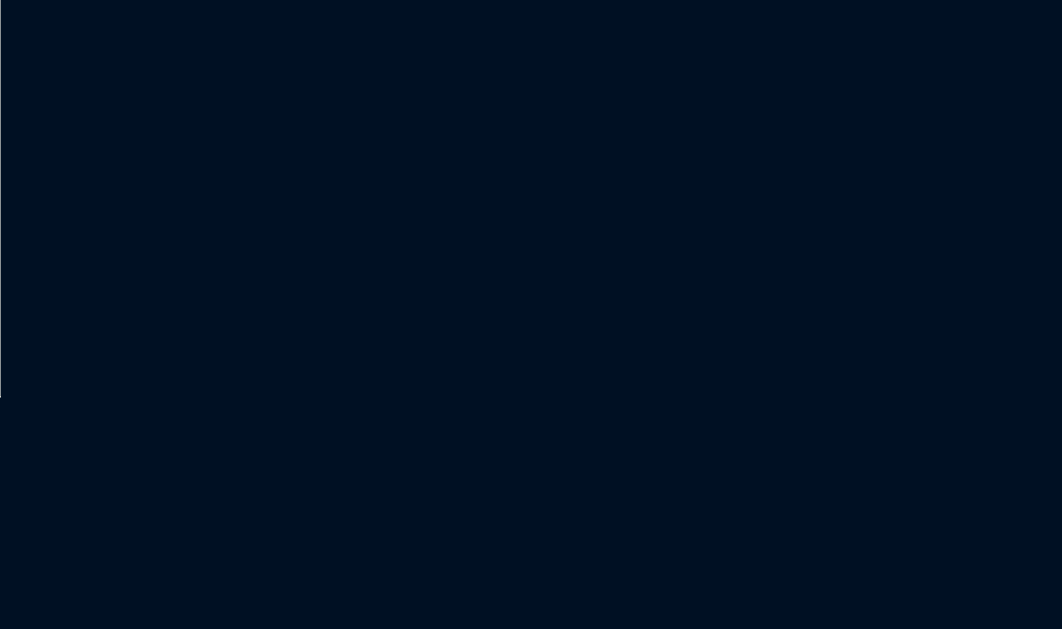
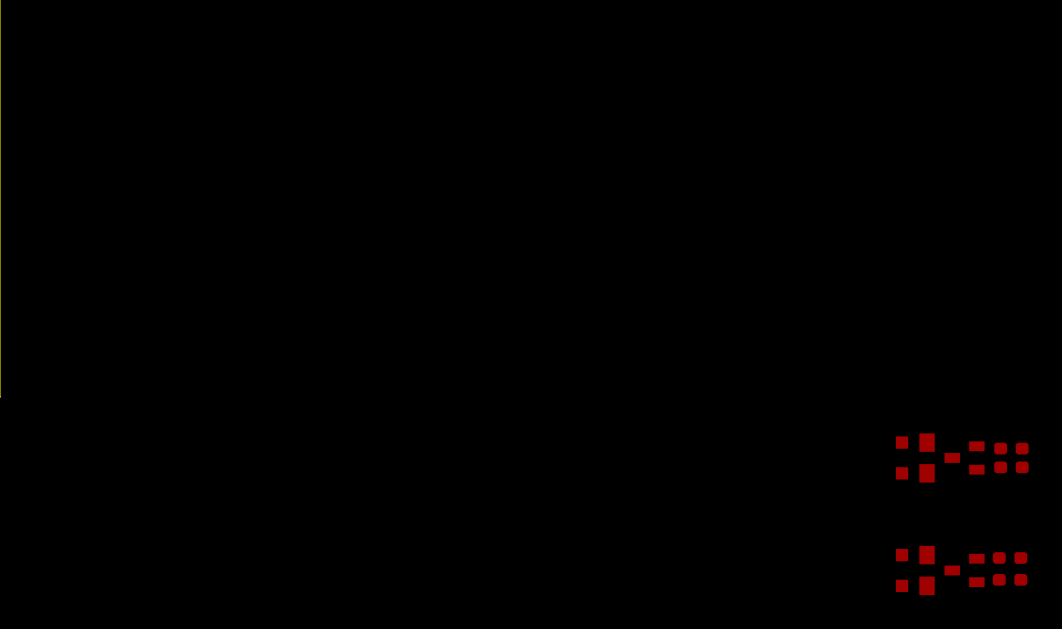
part: none -> (1011, 448)
part: none -> (902, 457)
part: none -> (927, 457)
part: none -> (964, 457)
part: none -> (1011, 467)
part: none -> (1010, 557)
part: none -> (902, 570)
part: none -> (927, 570)
part: none -> (964, 570)
part: none -> (1010, 579)

